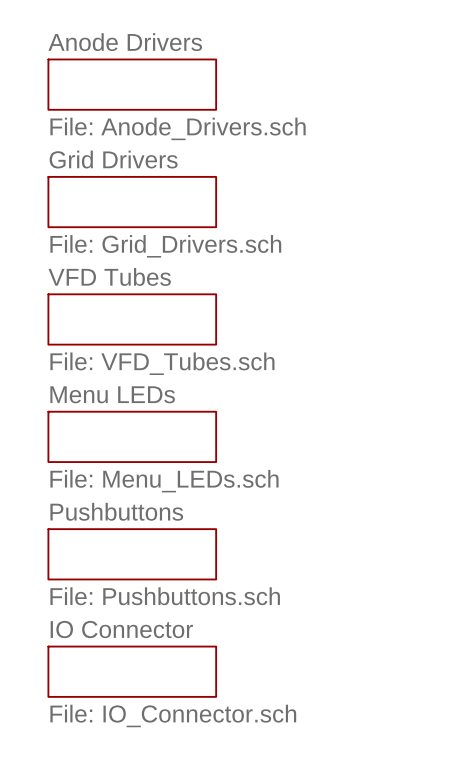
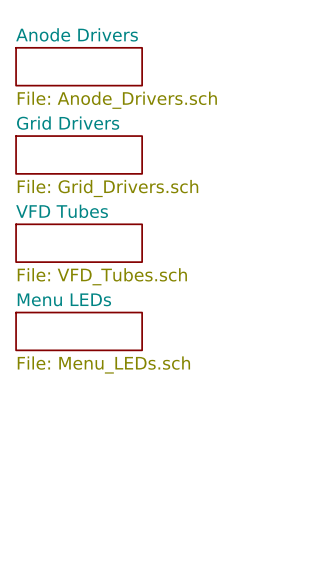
sheet Pushbuttons: File: Pushbuttons.sch (132, 554) -> none
sheet IO Connector: File: IO_Connector.sch (132, 671) -> none

